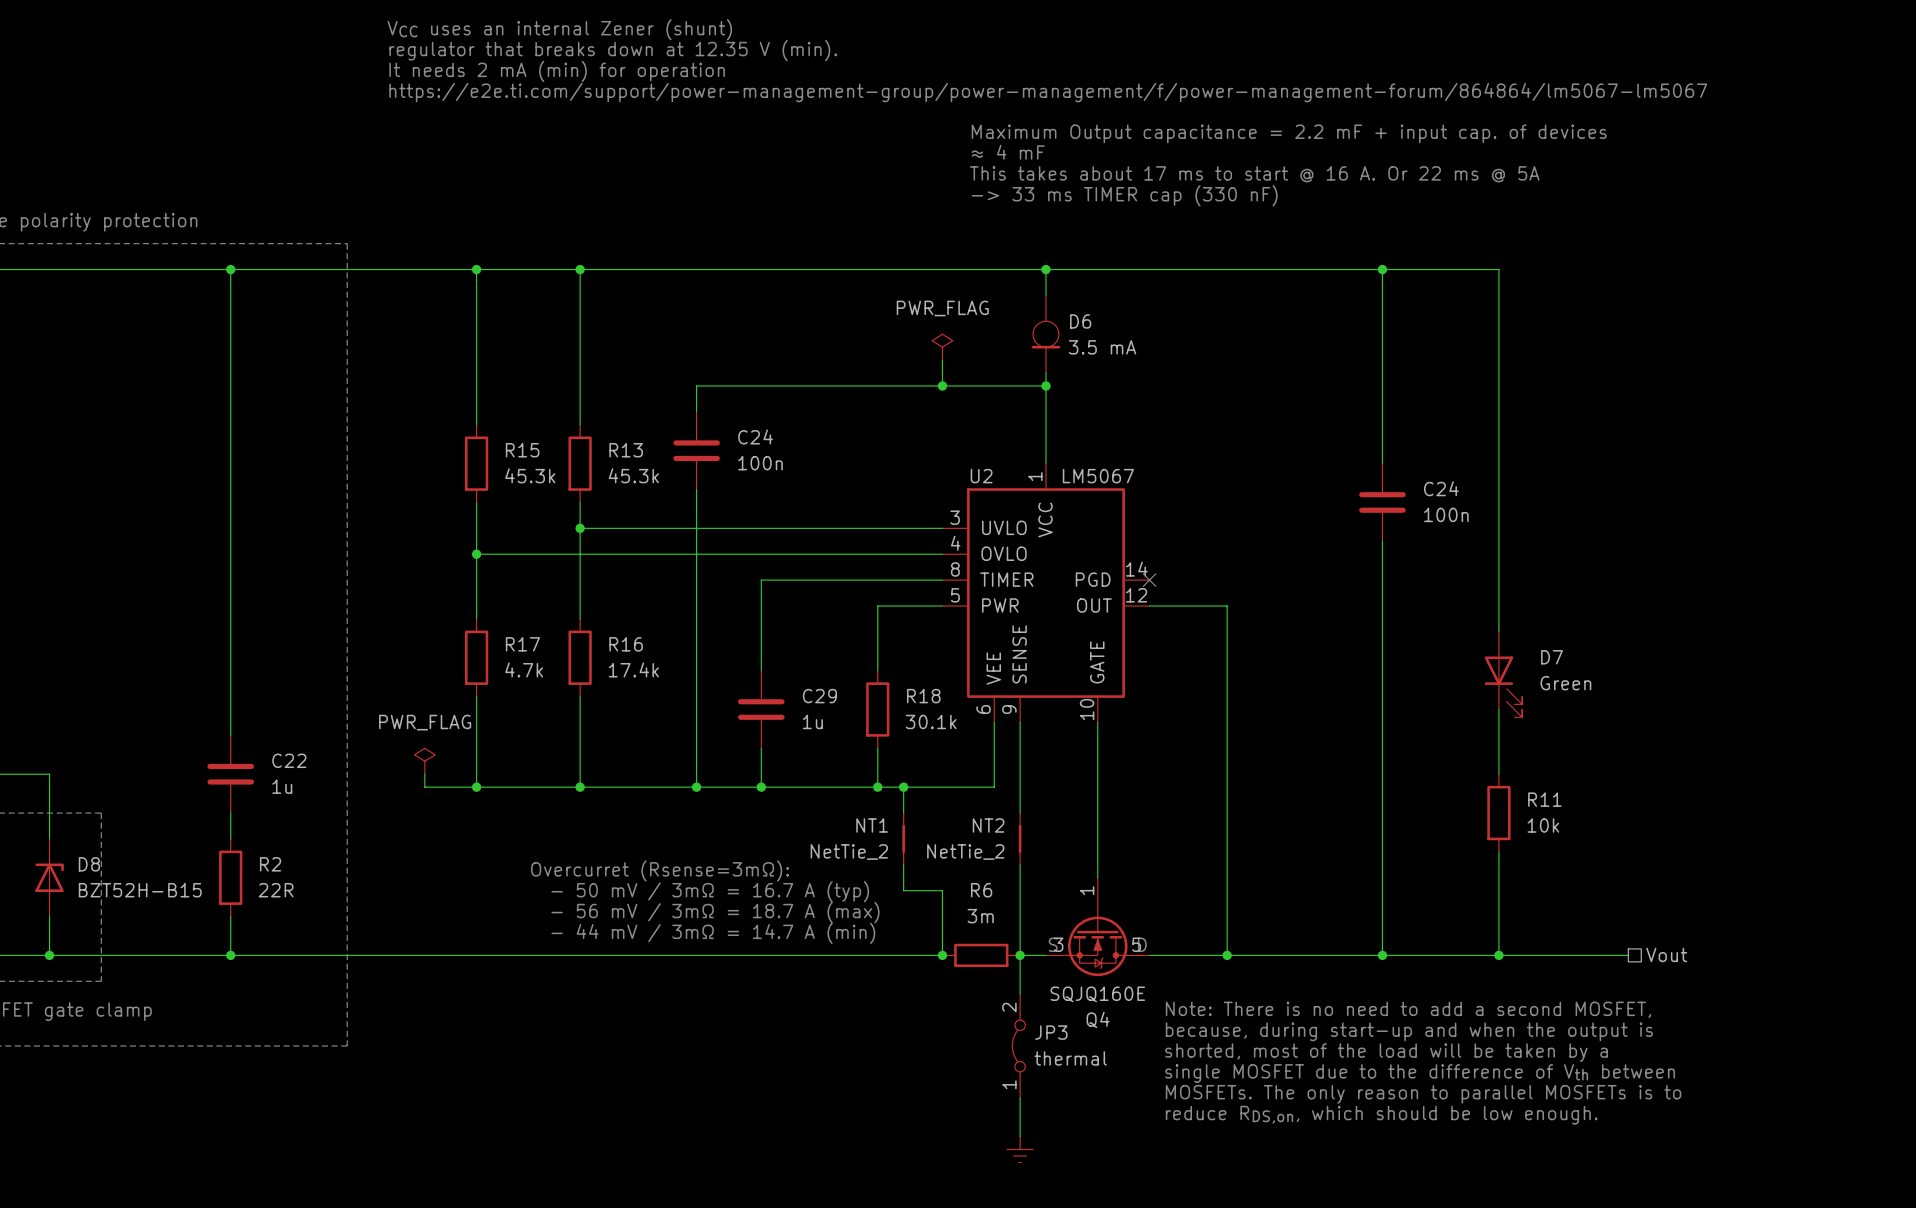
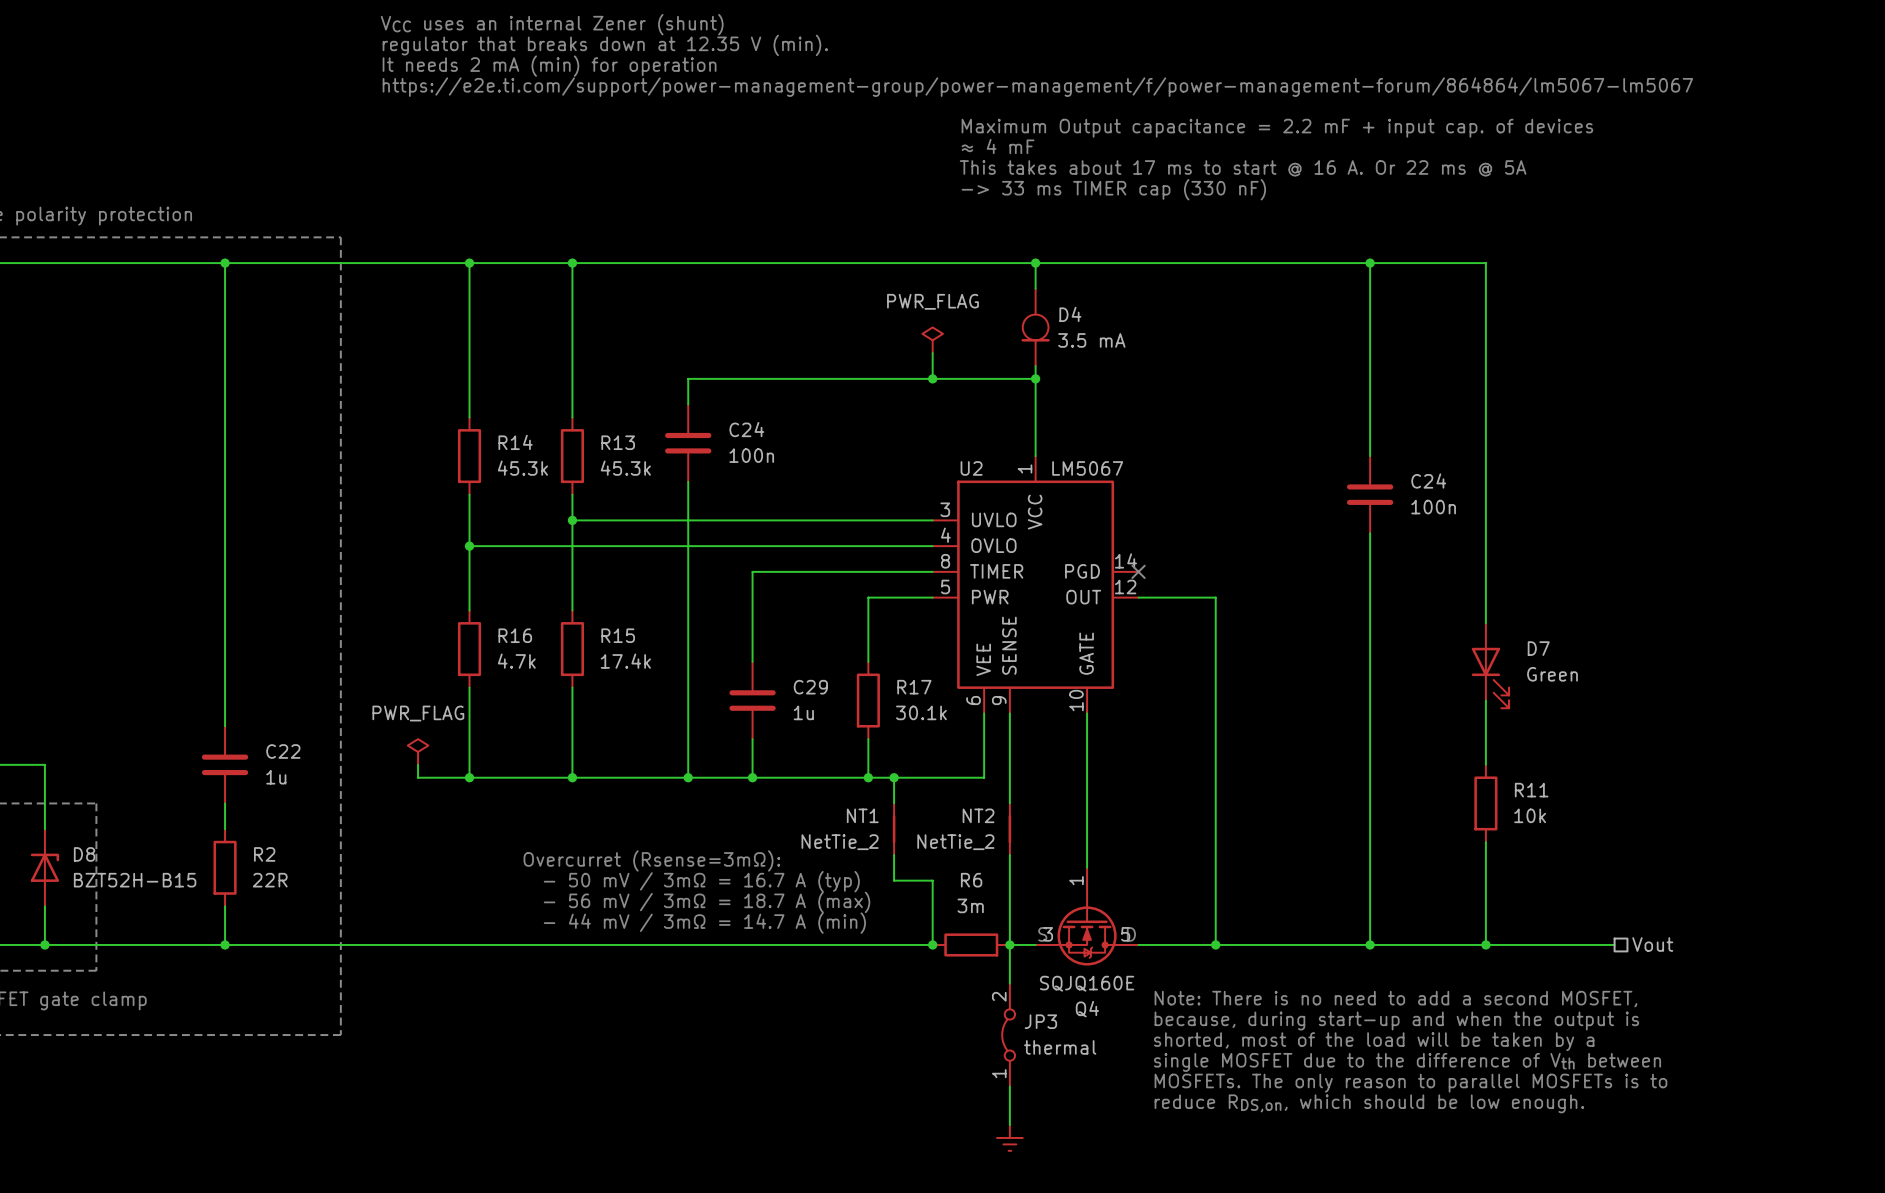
D6 name: D6 (1080, 321) -> D4 (1070, 314)
R15 name: R15 (522, 450) -> R14 (515, 442)
R17 name: R17 (522, 644) -> R16 (515, 635)
R16 name: R16 (626, 644) -> R15 (618, 635)
R18 name: R18 (923, 696) -> R17 (914, 687)

